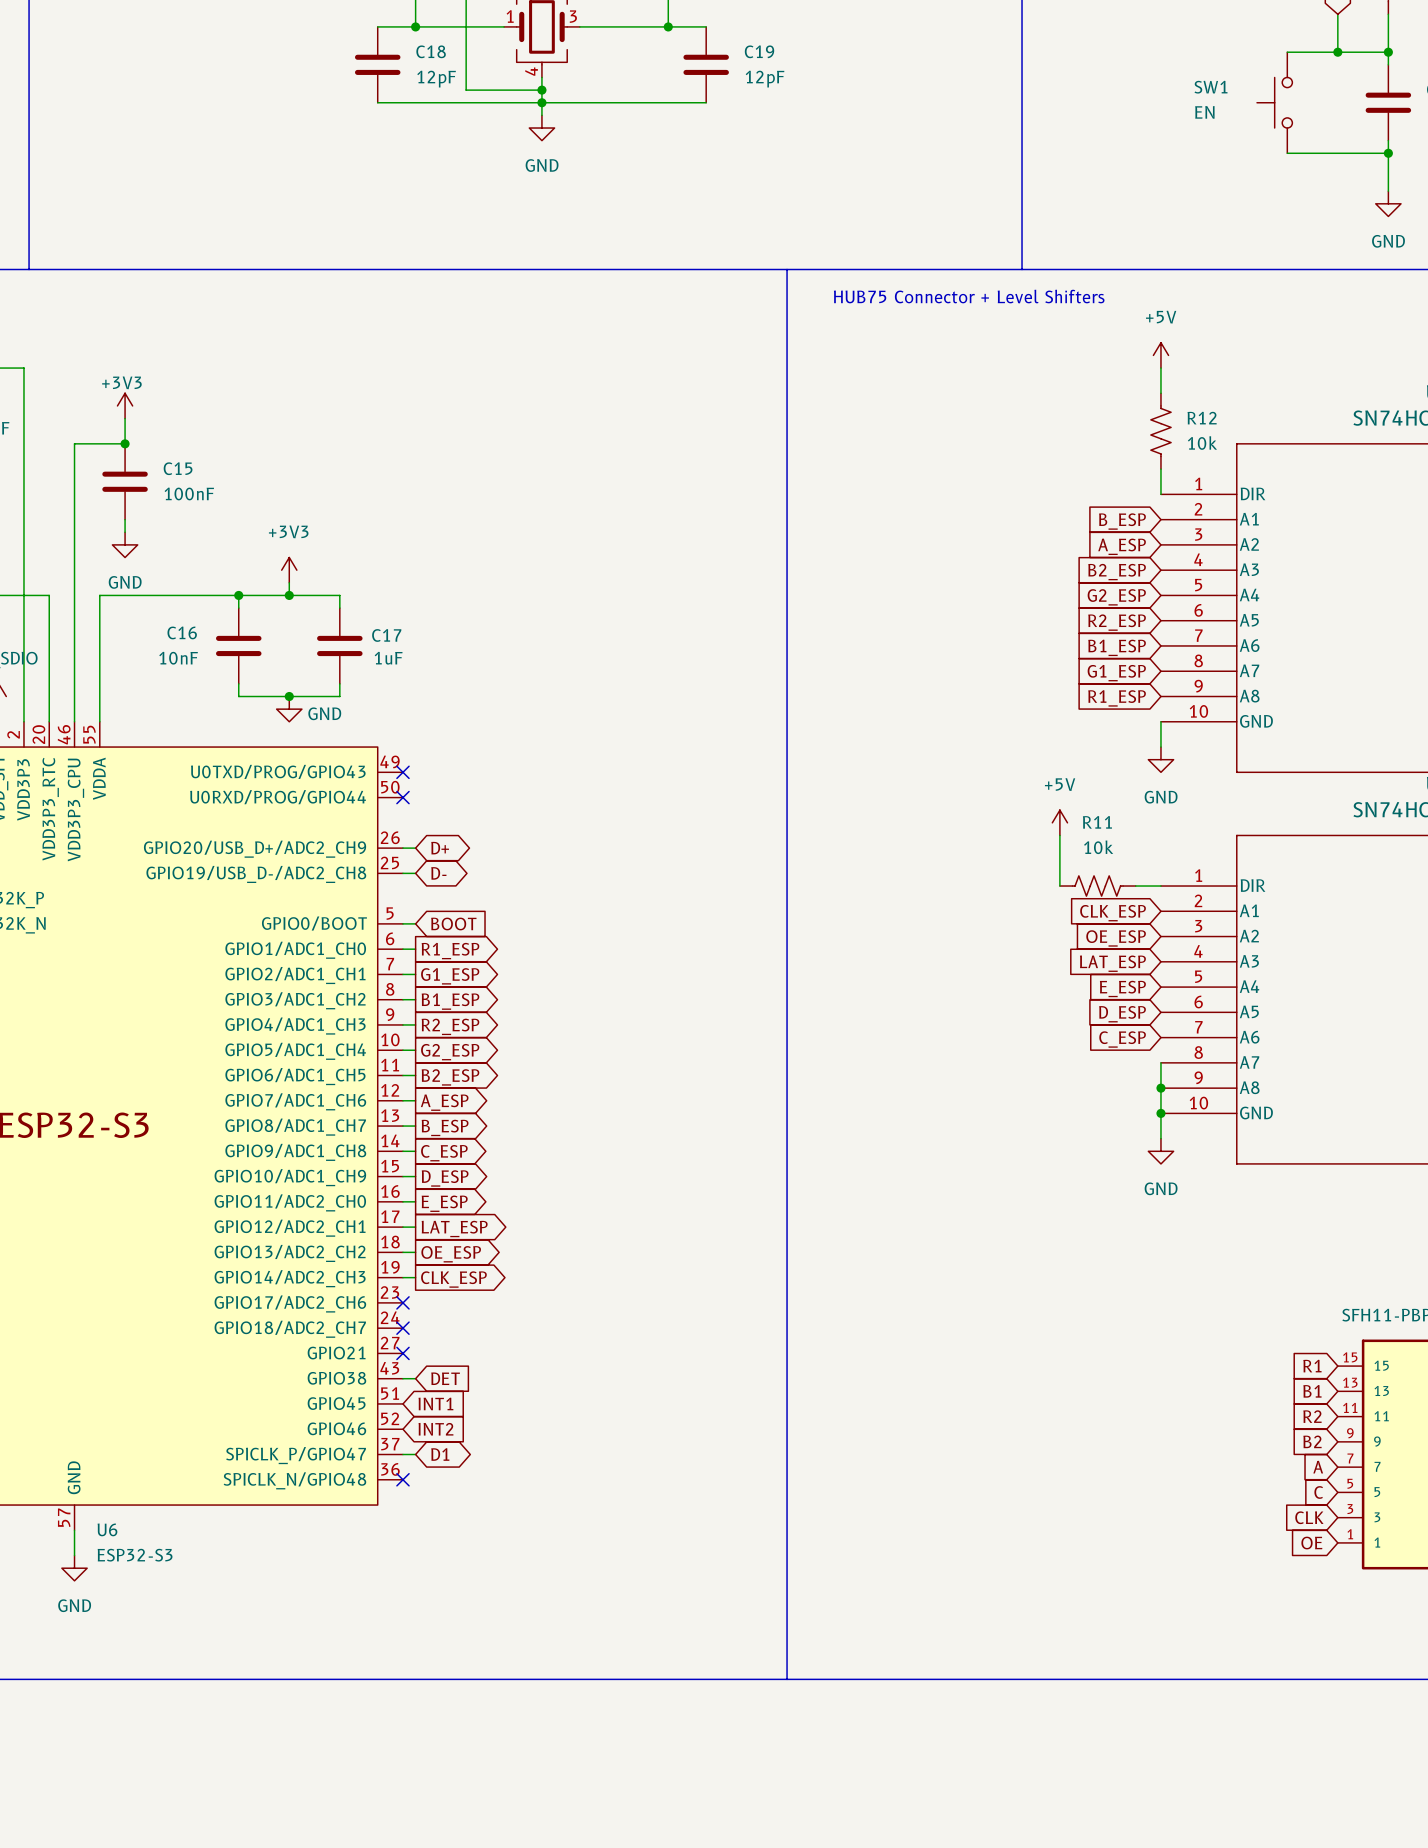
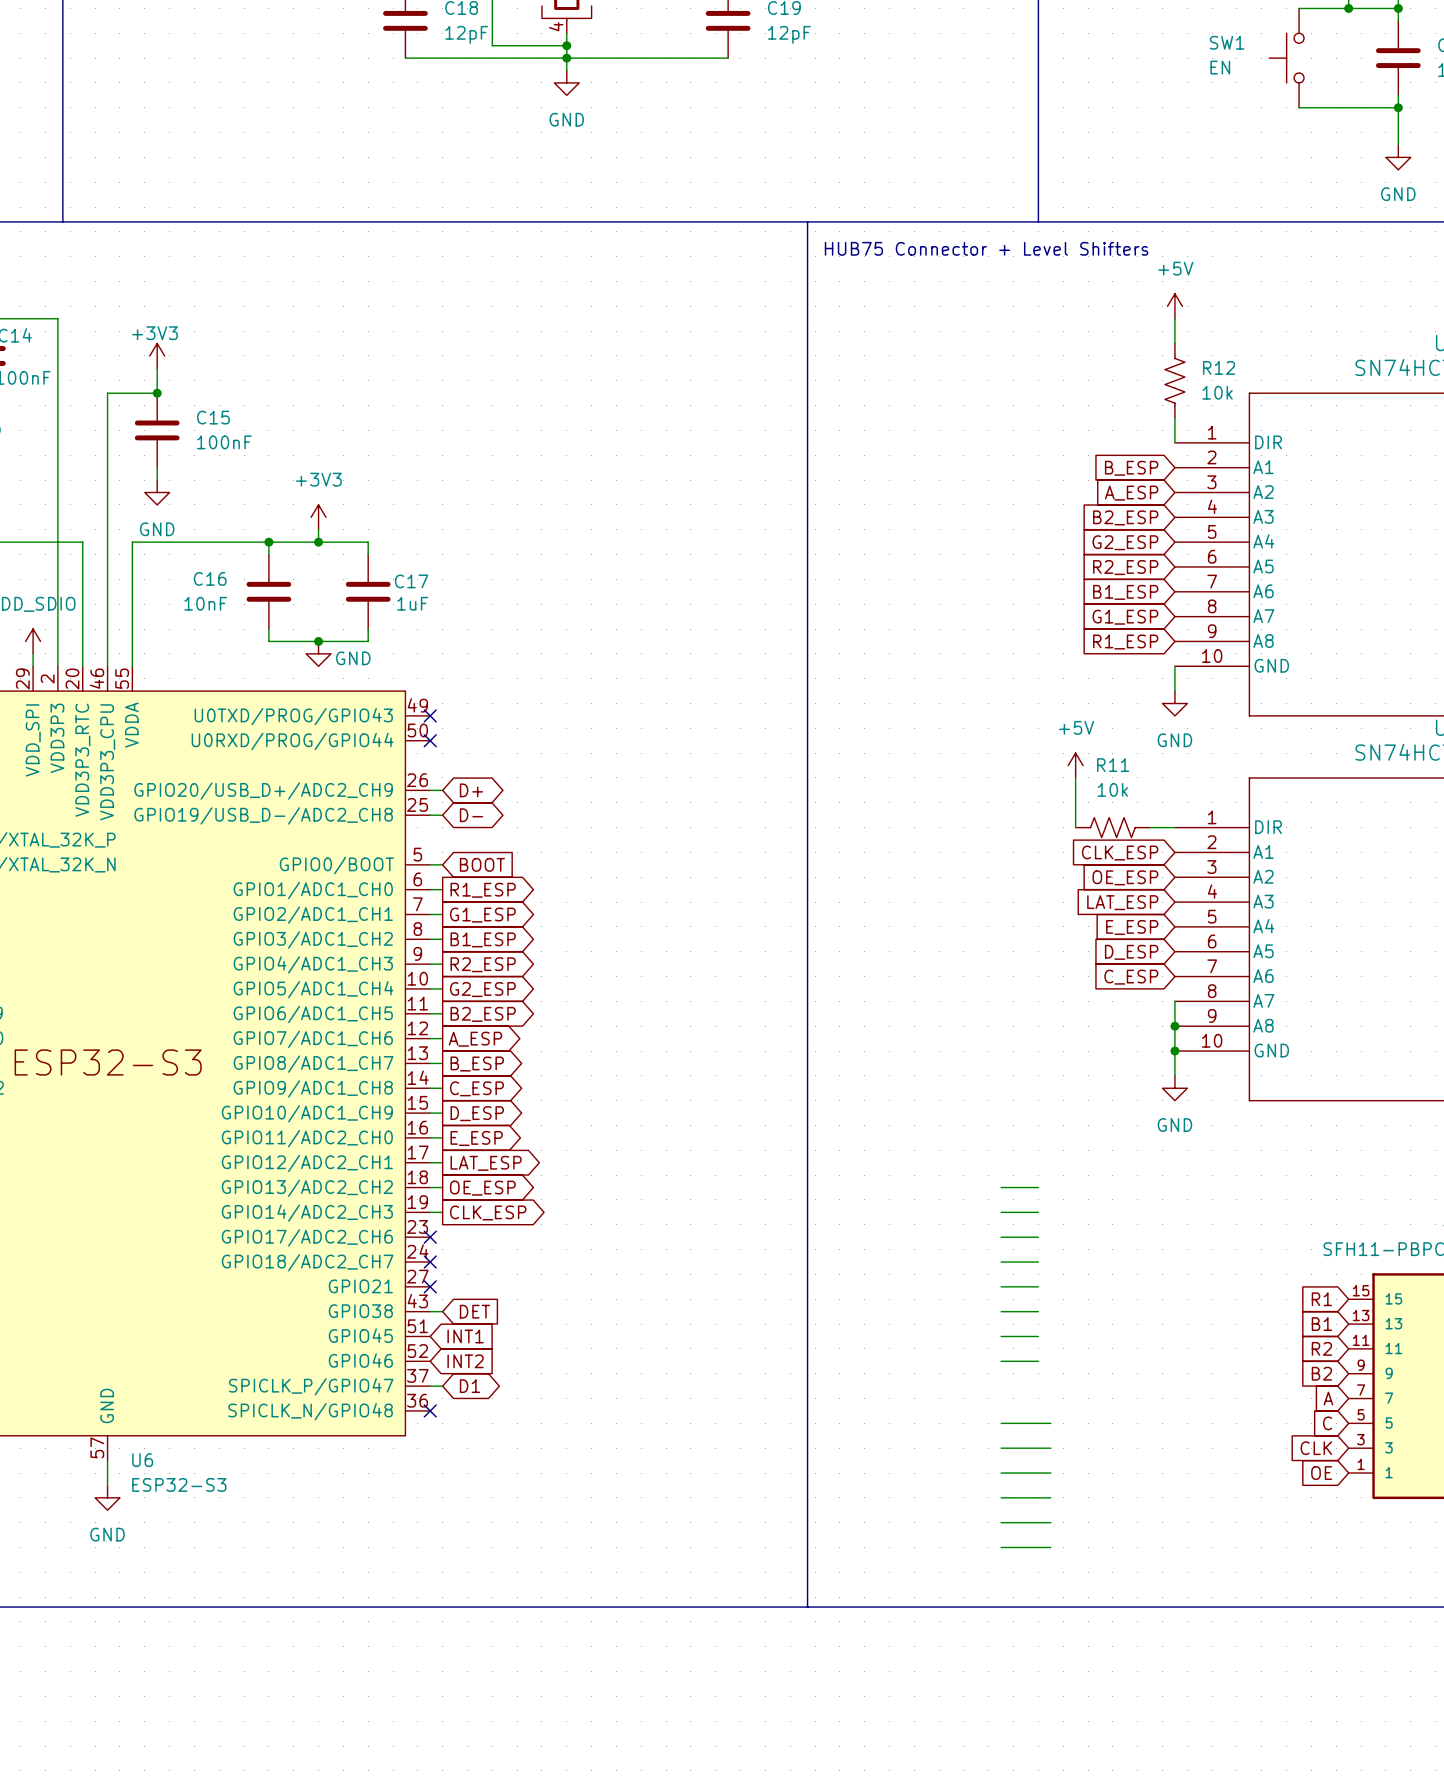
wire: none -> (1001, 1187) (1038, 1187)
wire: none -> (1001, 1212) (1038, 1212)
wire: none -> (1001, 1237) (1038, 1237)
wire: none -> (1001, 1262) (1038, 1262)
wire: none -> (1001, 1286) (1038, 1286)
wire: none -> (1001, 1311) (1038, 1311)
wire: none -> (1001, 1336) (1038, 1336)
wire: none -> (1001, 1361) (1038, 1361)
wire: none -> (1001, 1423) (1050, 1423)
wire: none -> (1001, 1448) (1050, 1448)
wire: none -> (1001, 1473) (1050, 1473)
wire: none -> (1001, 1497) (1050, 1497)
wire: none -> (1001, 1522) (1050, 1522)
wire: none -> (1001, 1547) (1050, 1547)

